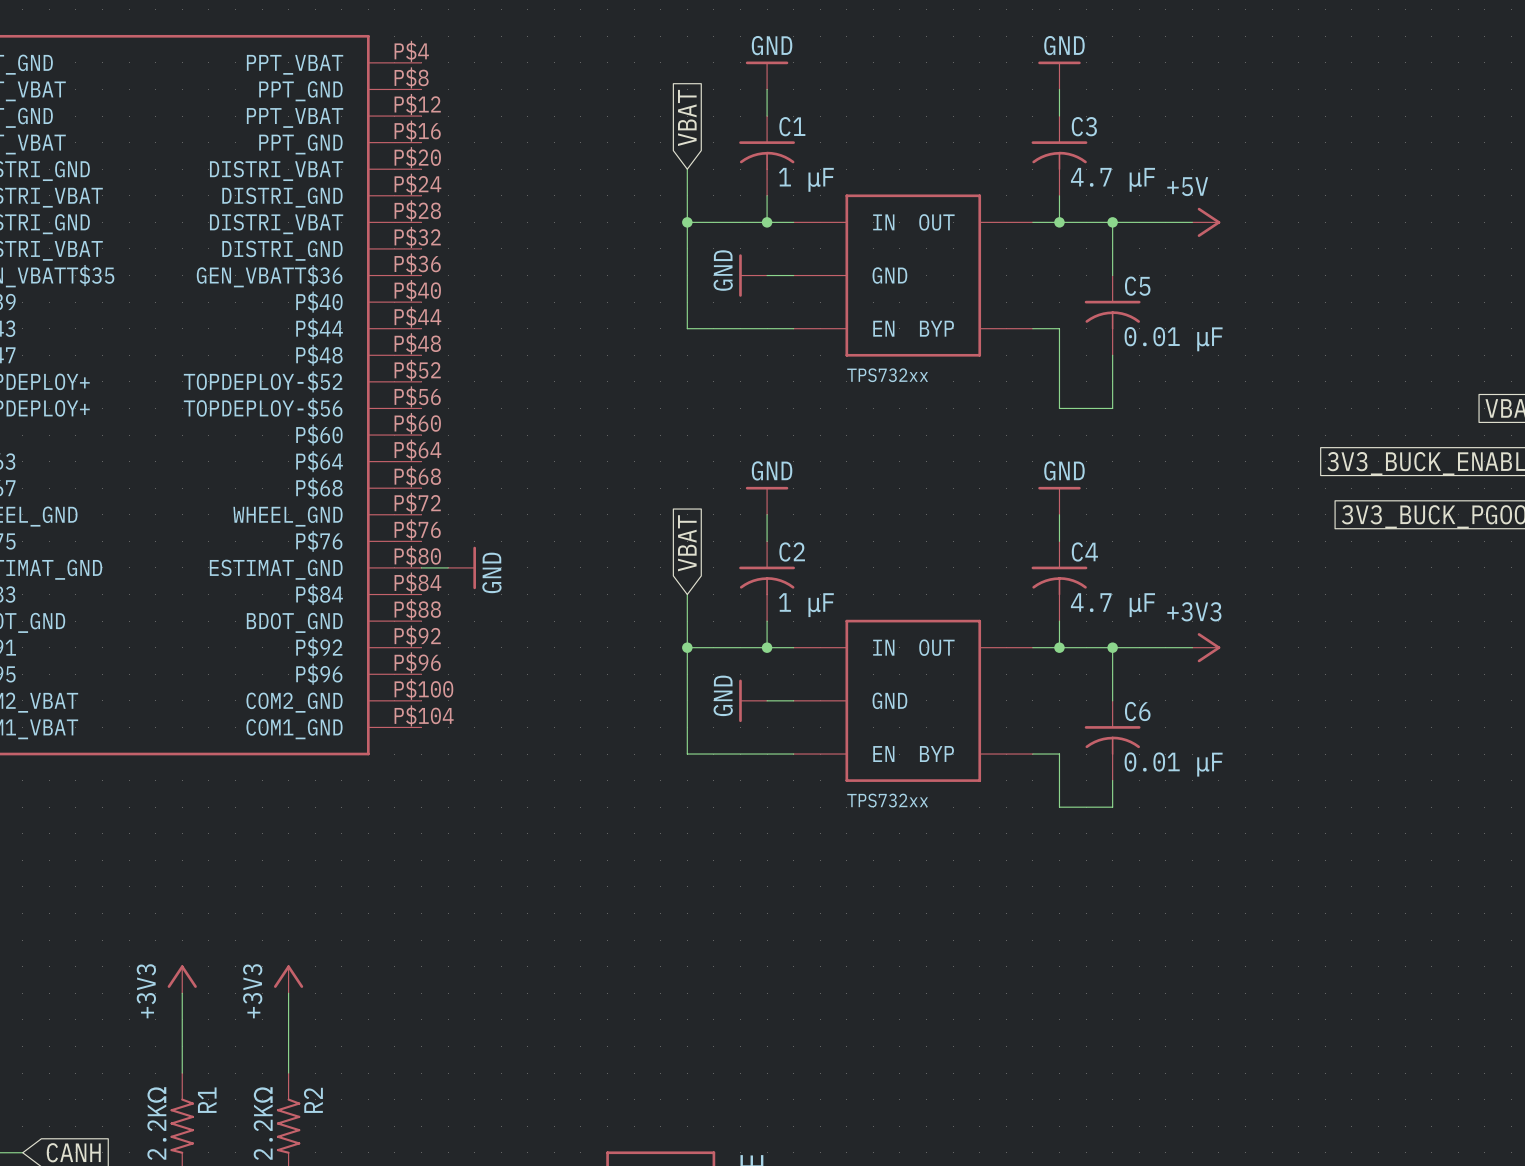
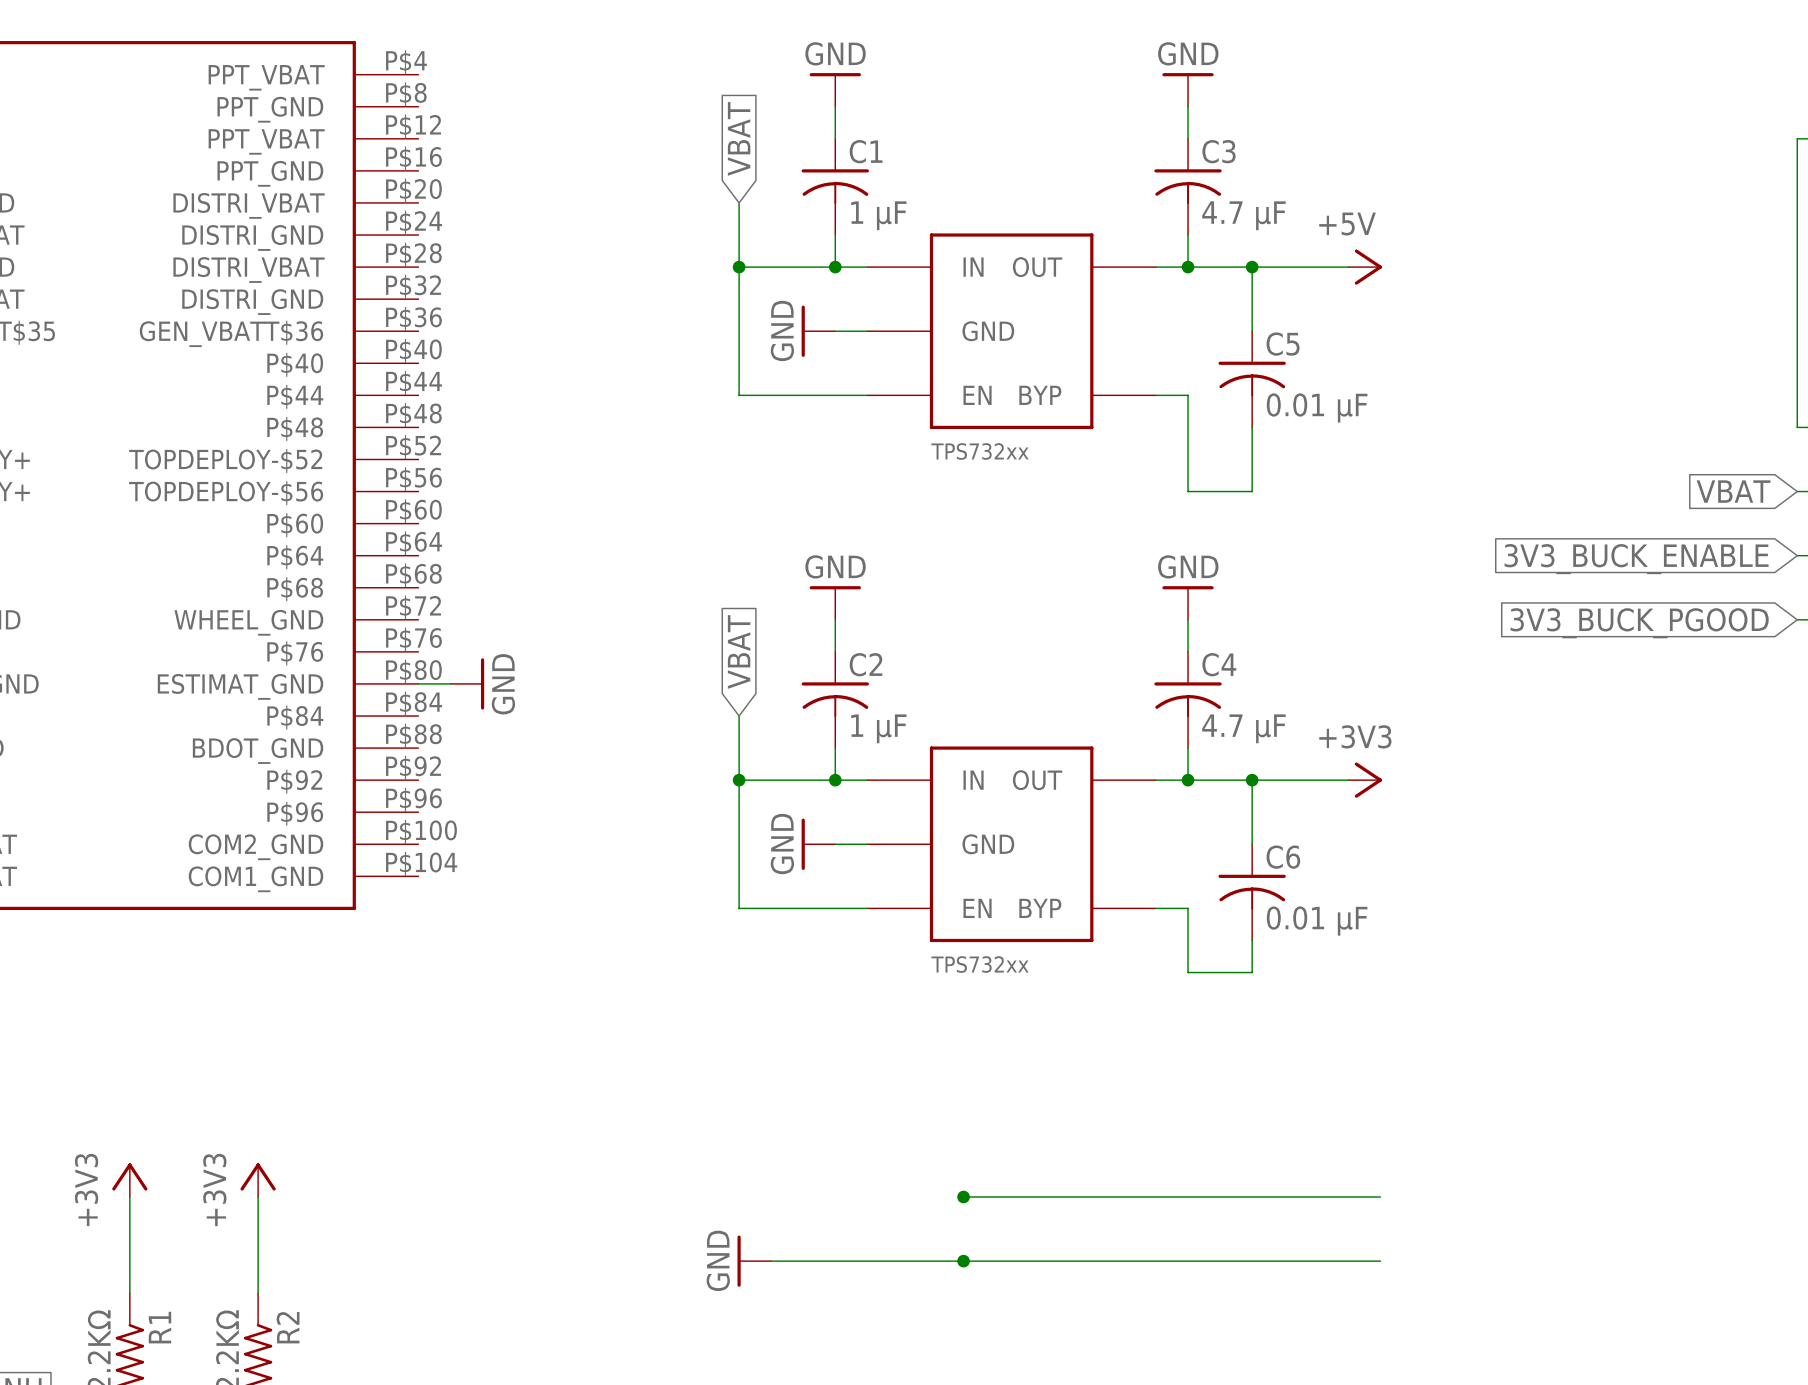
wire: none -> (963, 1197) (1380, 1197)
junction: none -> (963, 1197)
power symbol: none -> GND (754, 1261)
wire: none -> (771, 1261) (1380, 1261)
junction: none -> (963, 1261)

